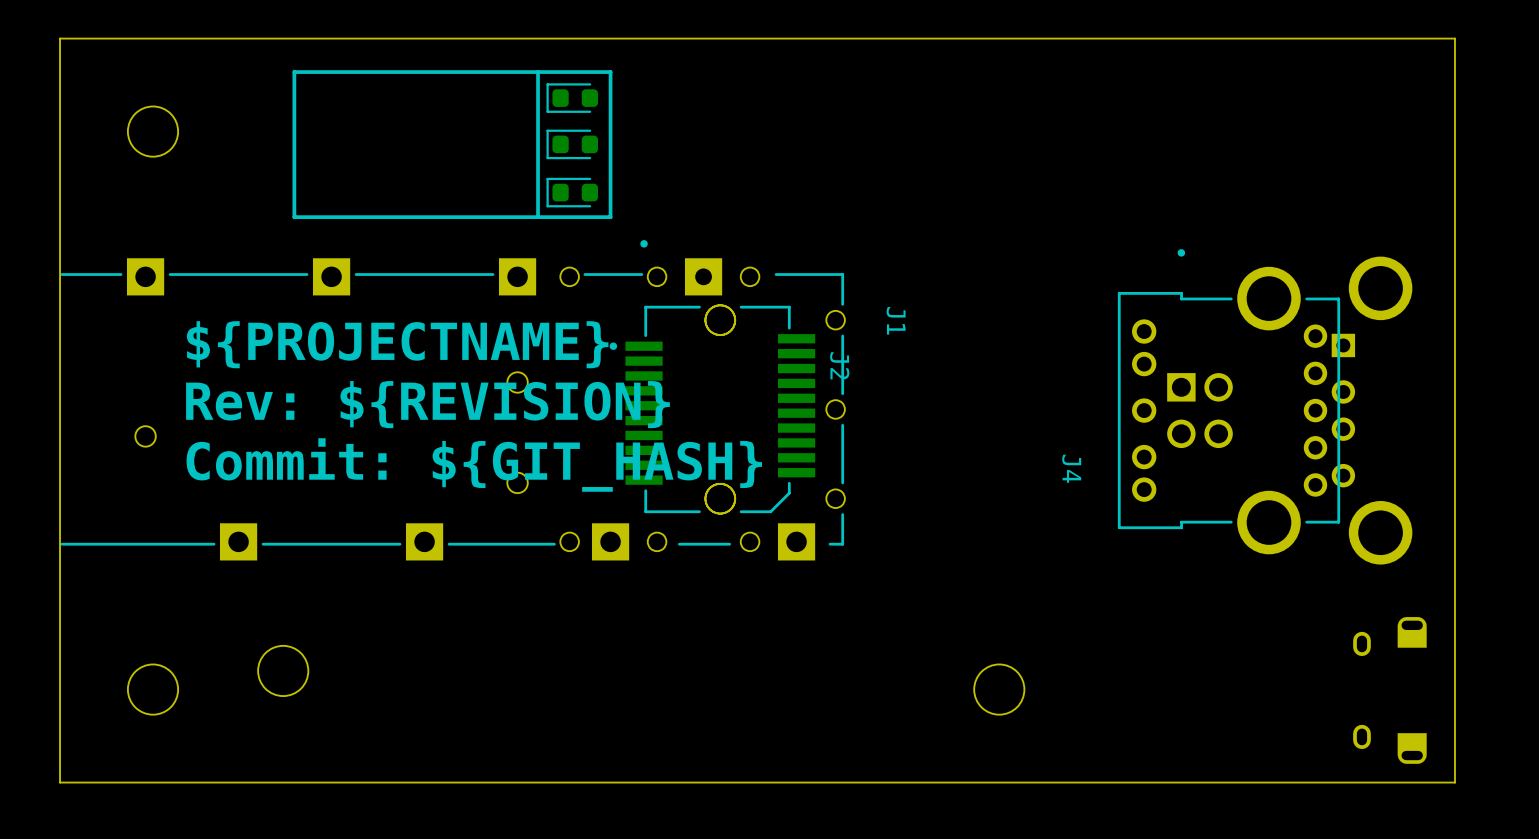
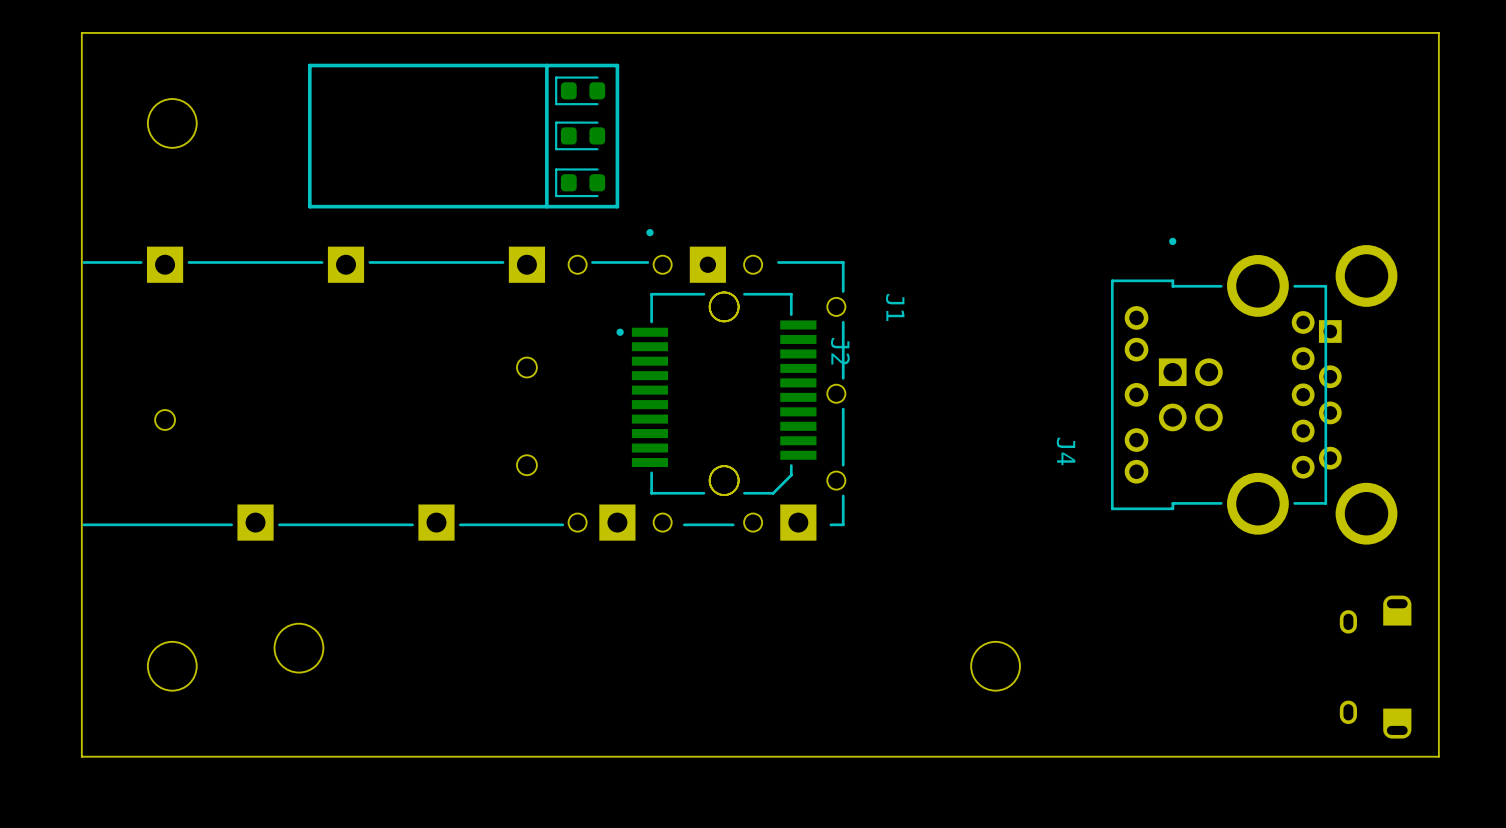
text: ${PROJECTNAME} (397, 344) -> none
text: Rev: ${REVISION} (427, 404) -> none
text: Commit: ${GIT_HASH} (474, 464) -> none

